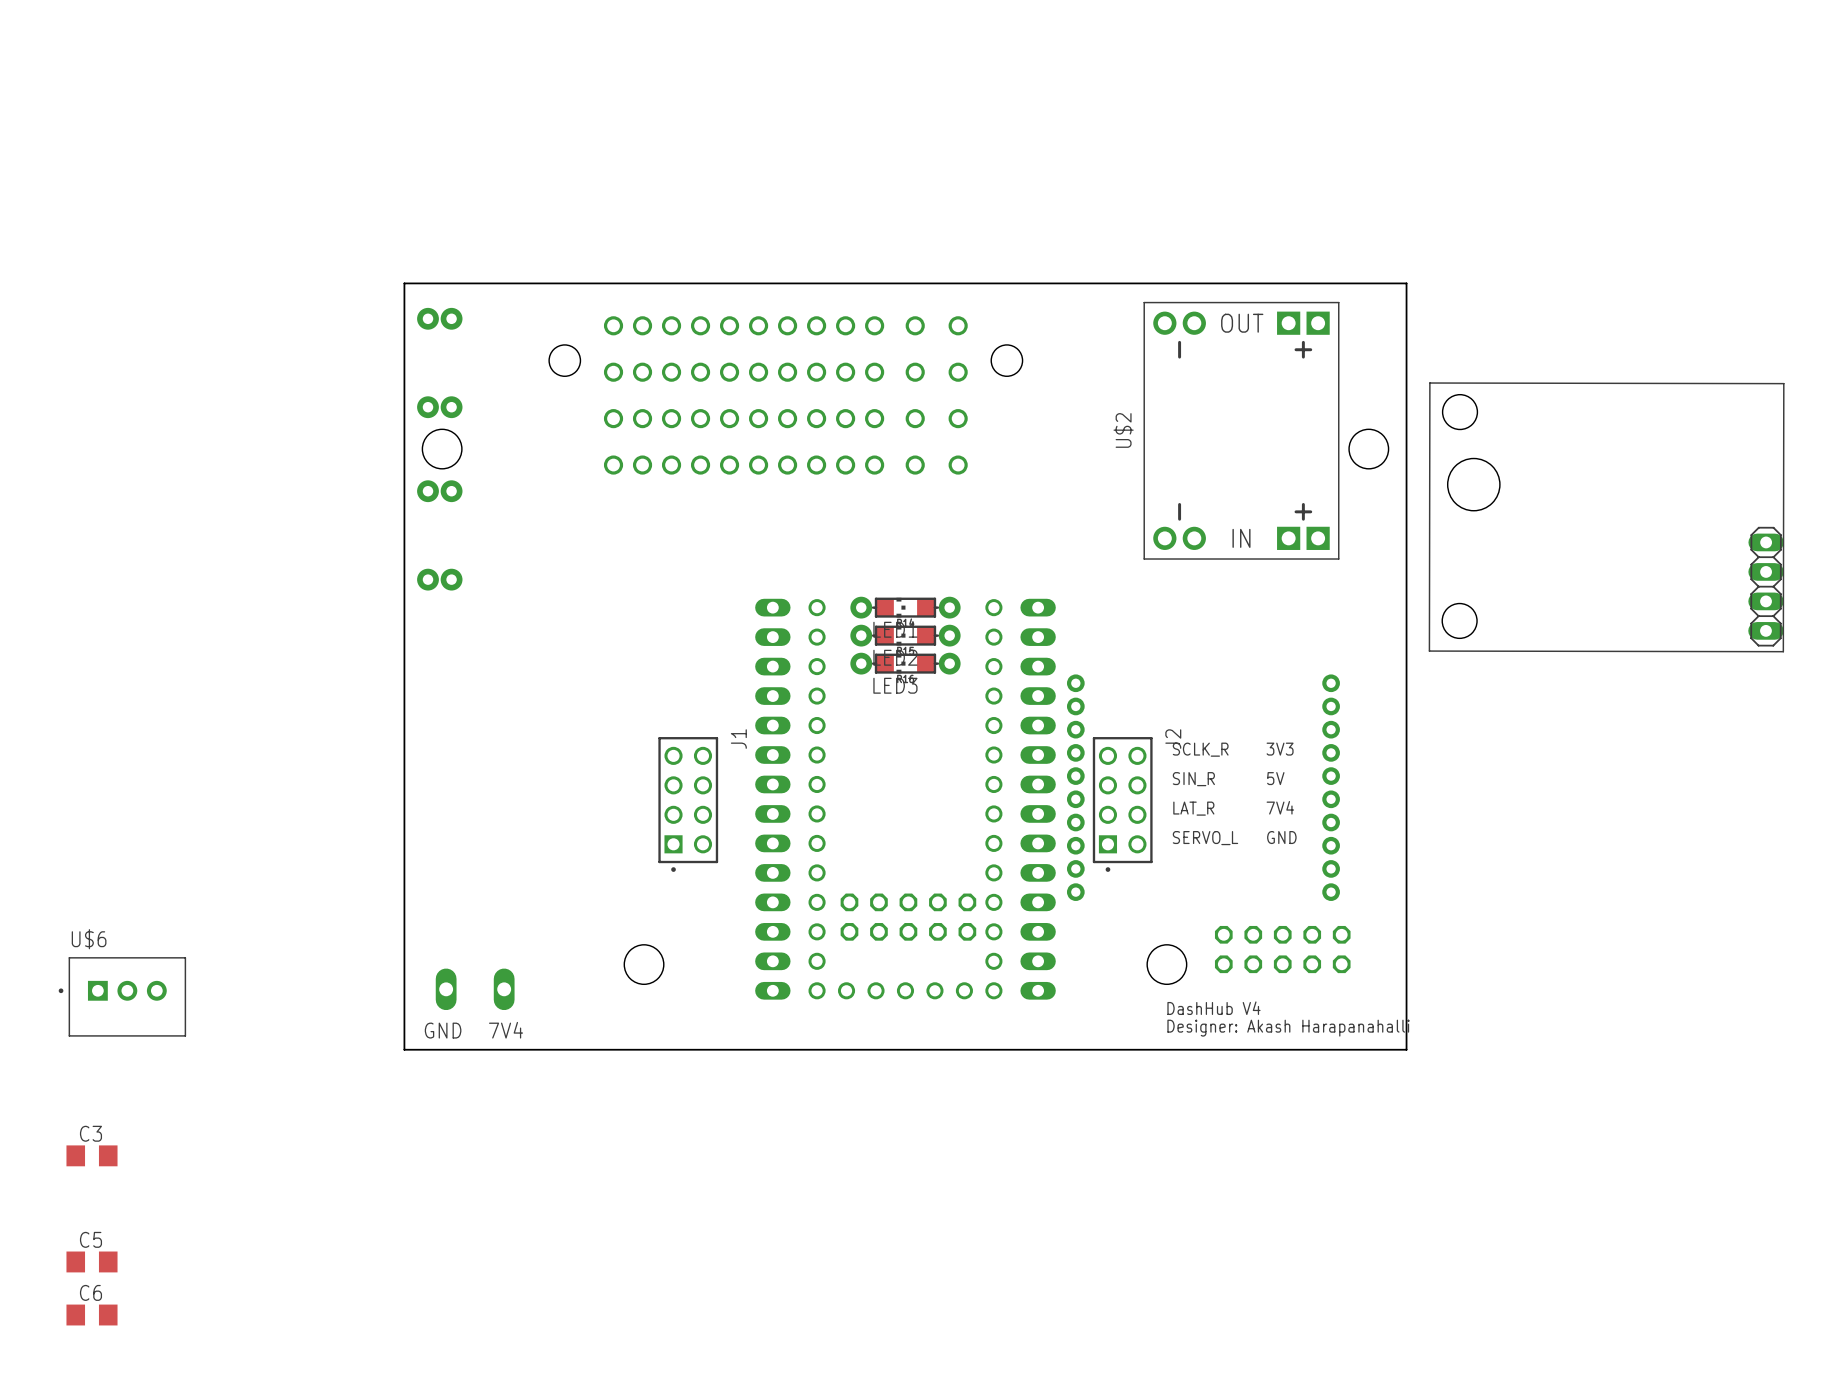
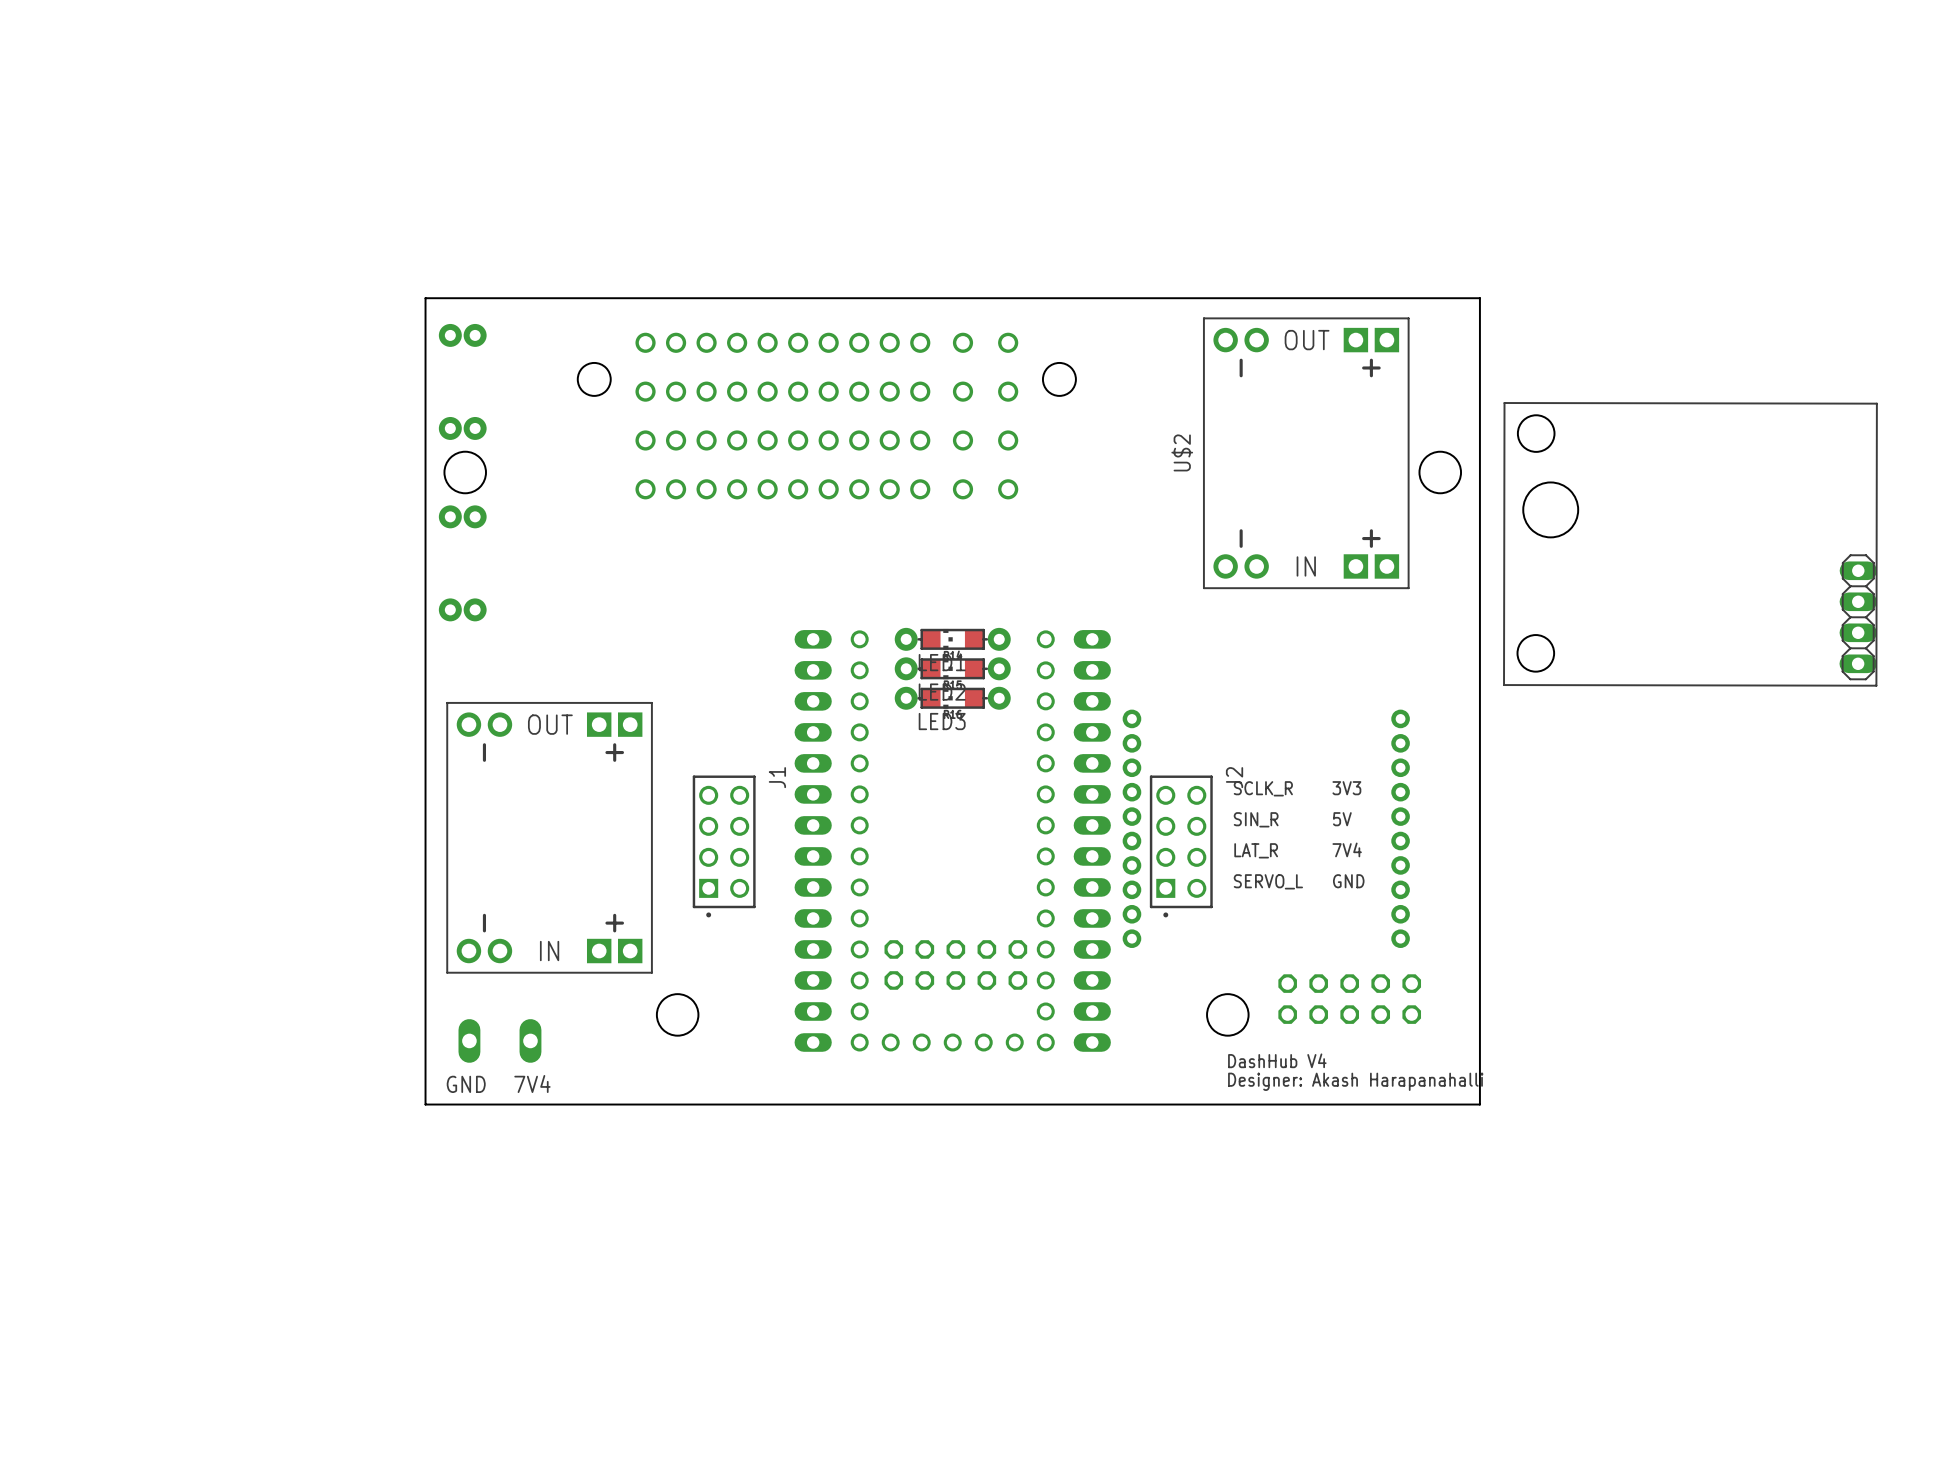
part: none -> (549, 837)
U$6: (122, 996) -> none
C3: (91, 1155) -> none
C5: (91, 1261) -> none
C6: (91, 1315) -> none

